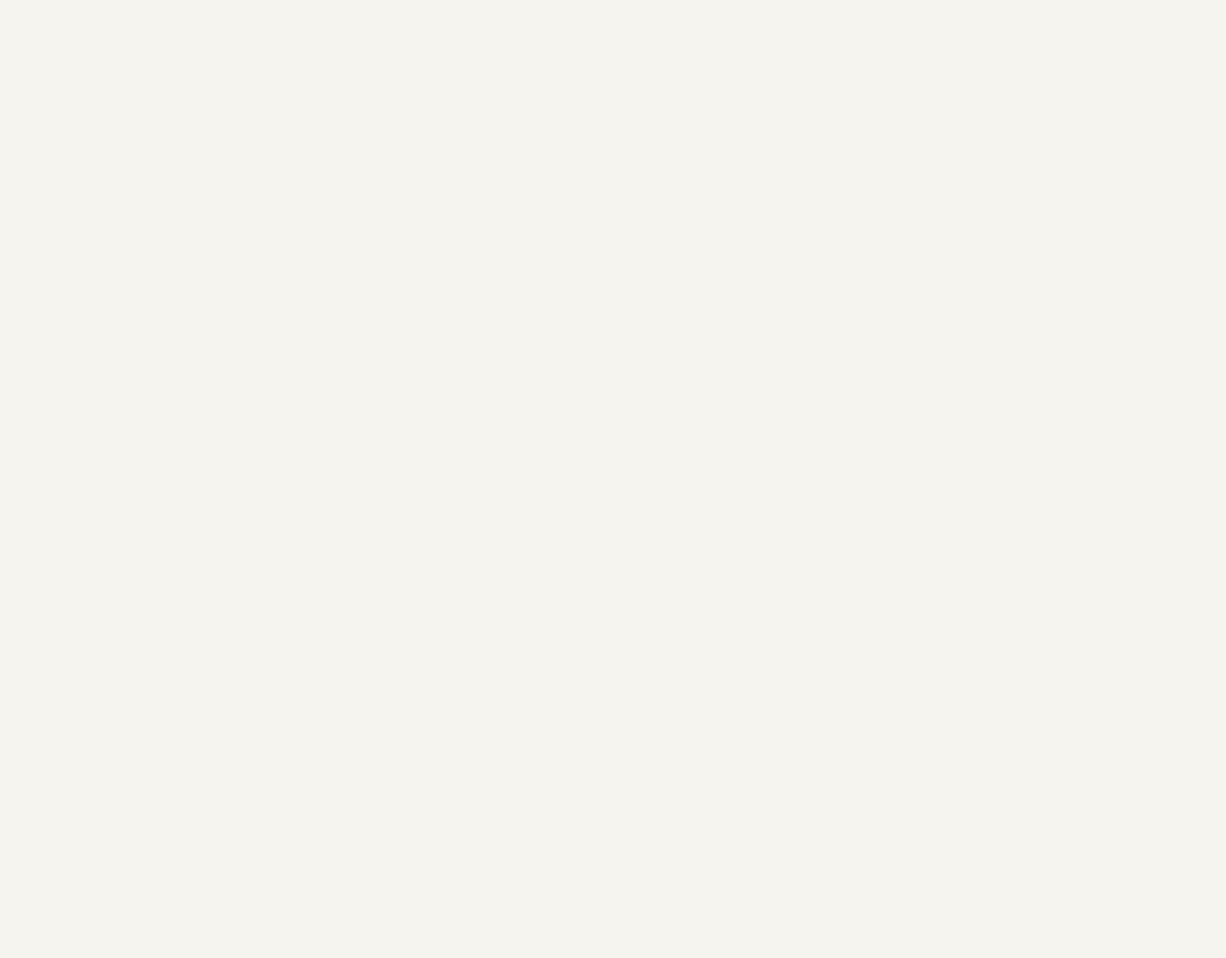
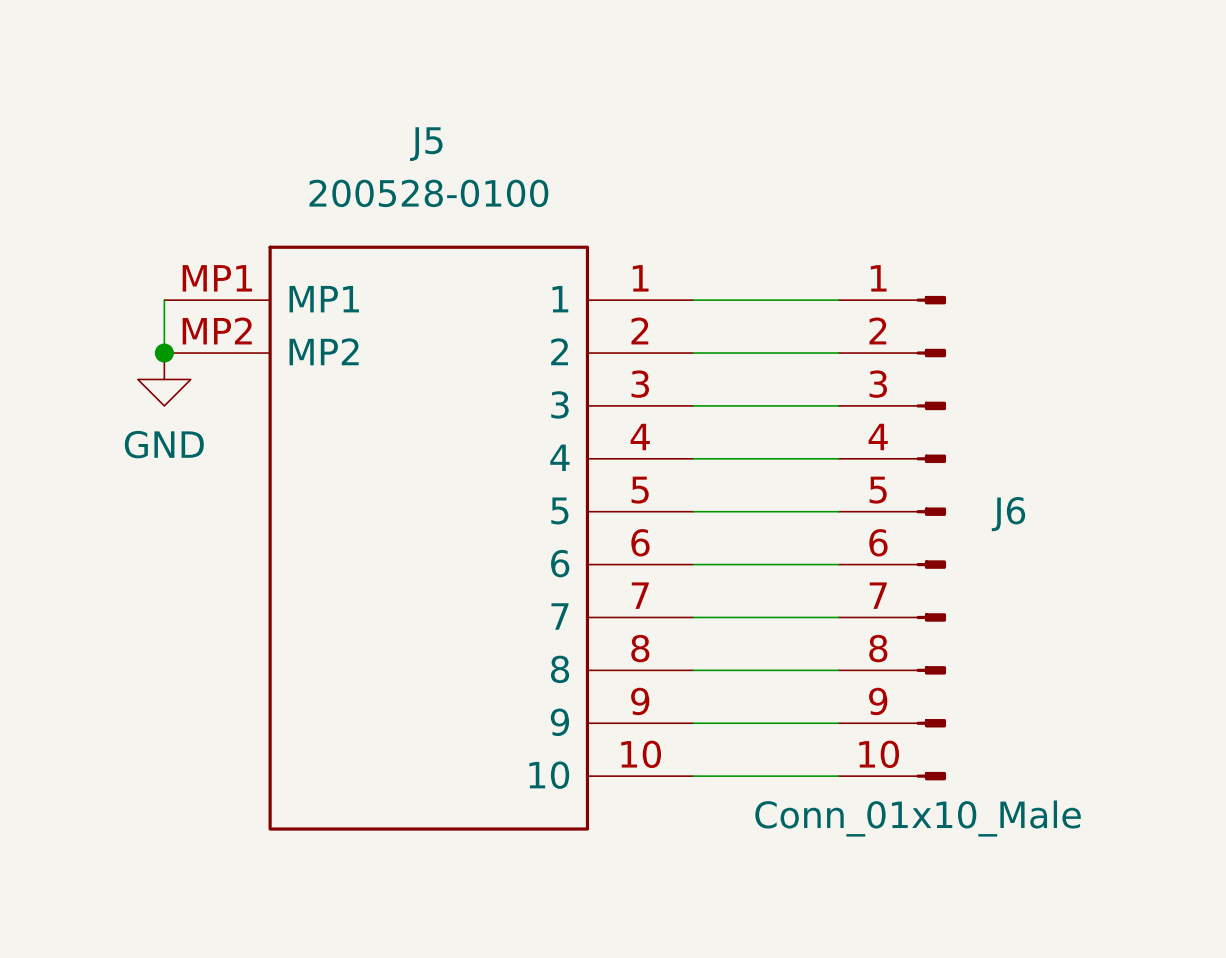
wire: none -> (164, 300) (164, 353)
wire: none -> (693, 300) (838, 300)
junction: none -> (164, 353)
wire: none -> (693, 353) (838, 353)
power symbol: none -> GND (164, 379)
wire: none -> (693, 405) (838, 405)
wire: none -> (693, 458) (838, 458)
wire: none -> (693, 511) (838, 511)
J5: none -> 200528-0100 (428, 538)
J6: none -> Conn_01x10_Male (892, 538)
wire: none -> (693, 564) (838, 564)
wire: none -> (693, 617) (838, 617)
wire: none -> (693, 670) (838, 670)
wire: none -> (693, 723) (838, 723)
wire: none -> (693, 776) (838, 776)

